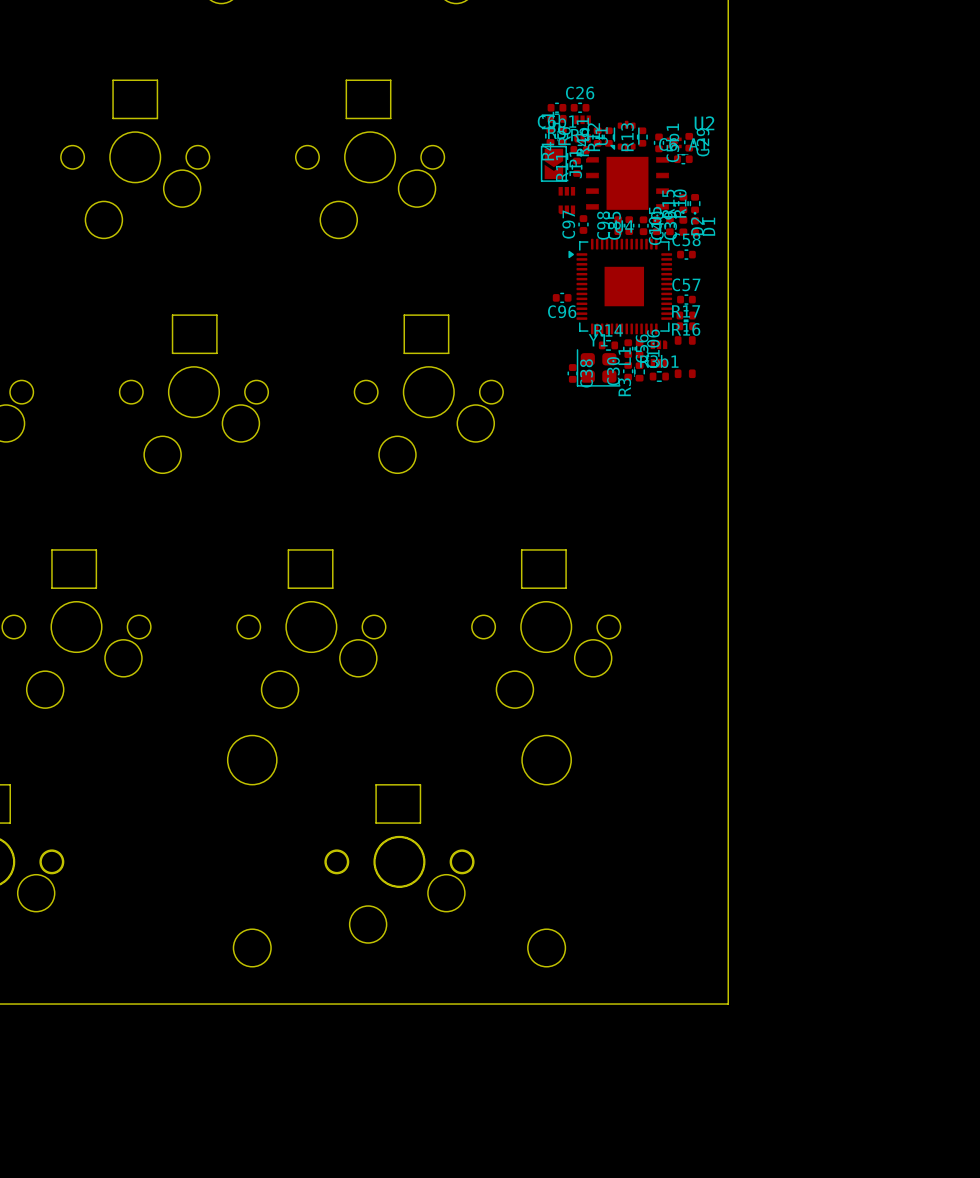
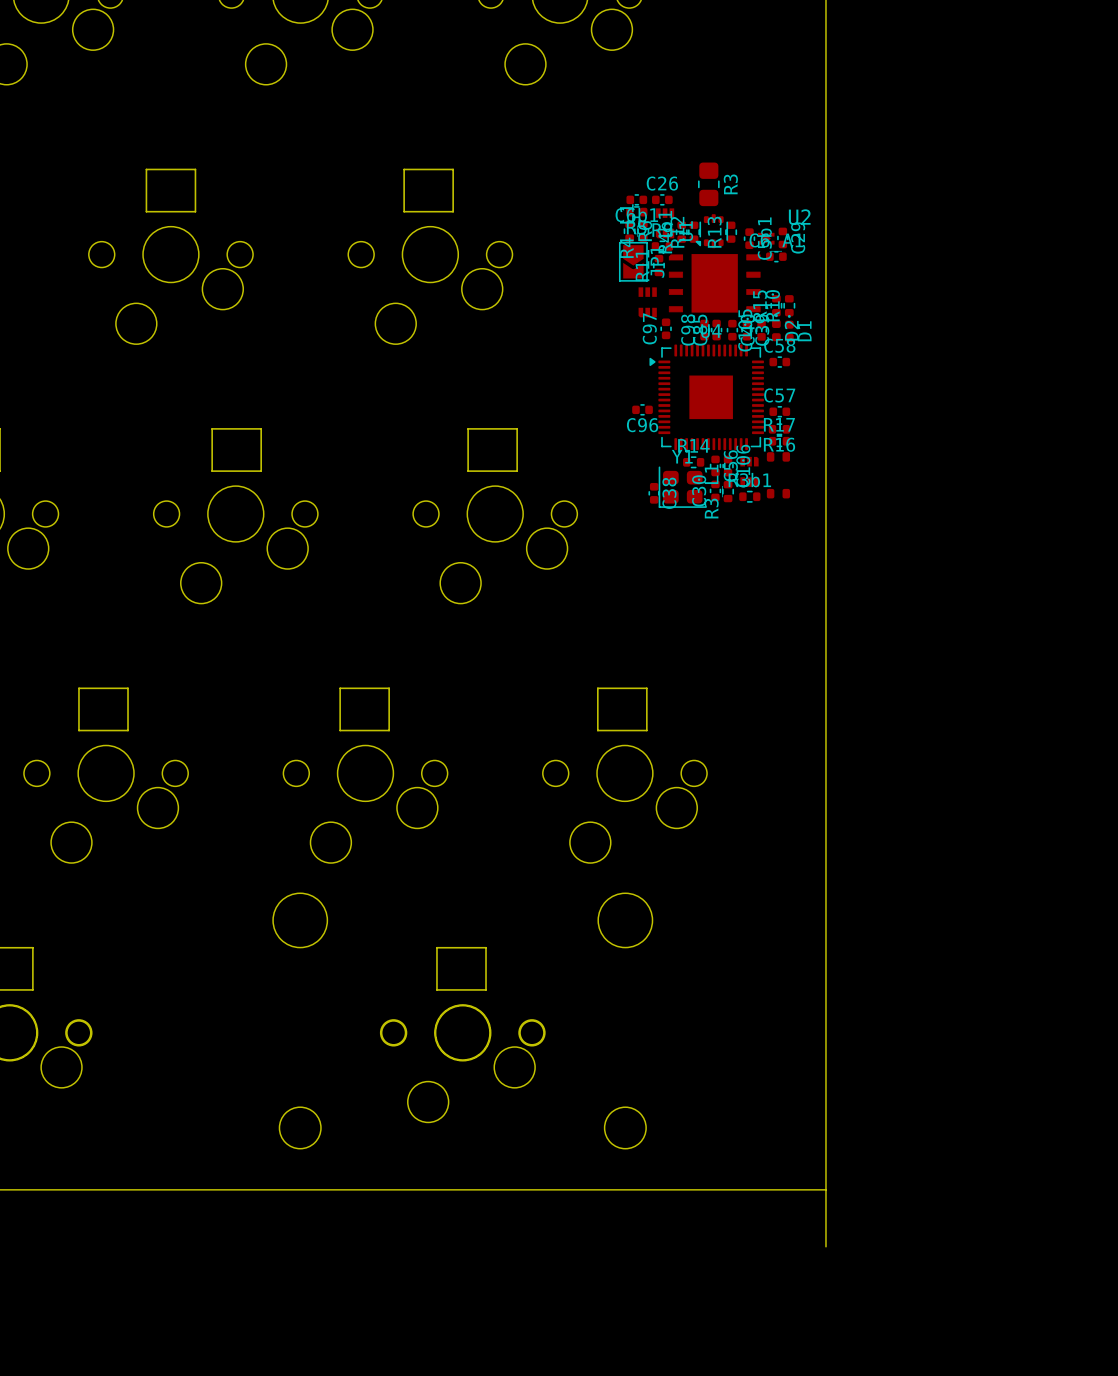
R3: none -> (708, 184)
board edge: none -> (825, 1189) (825, 1246)

